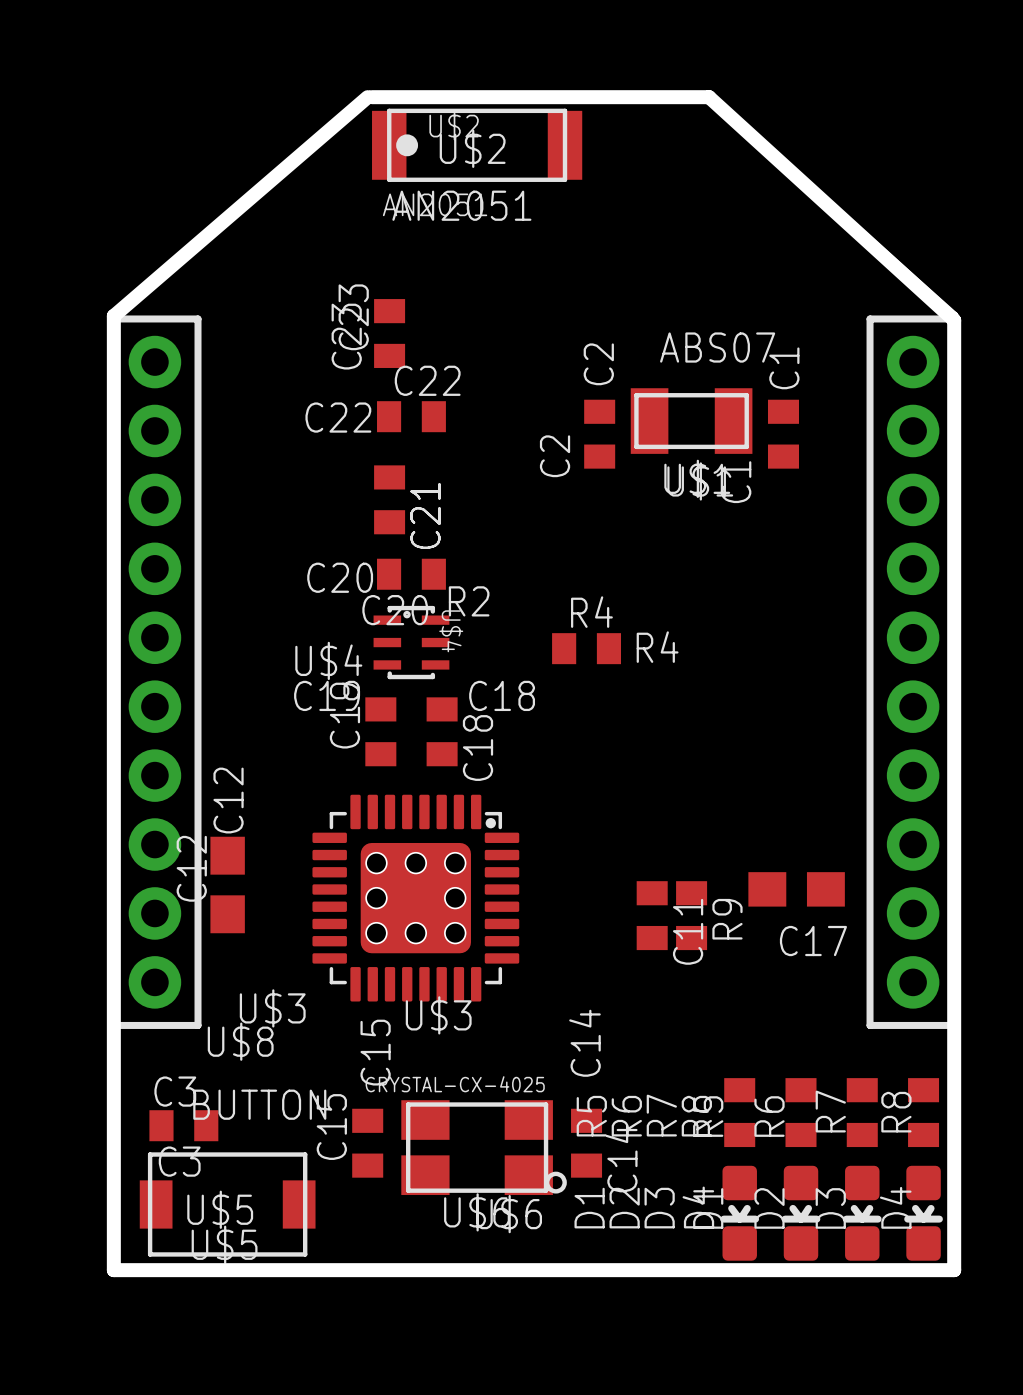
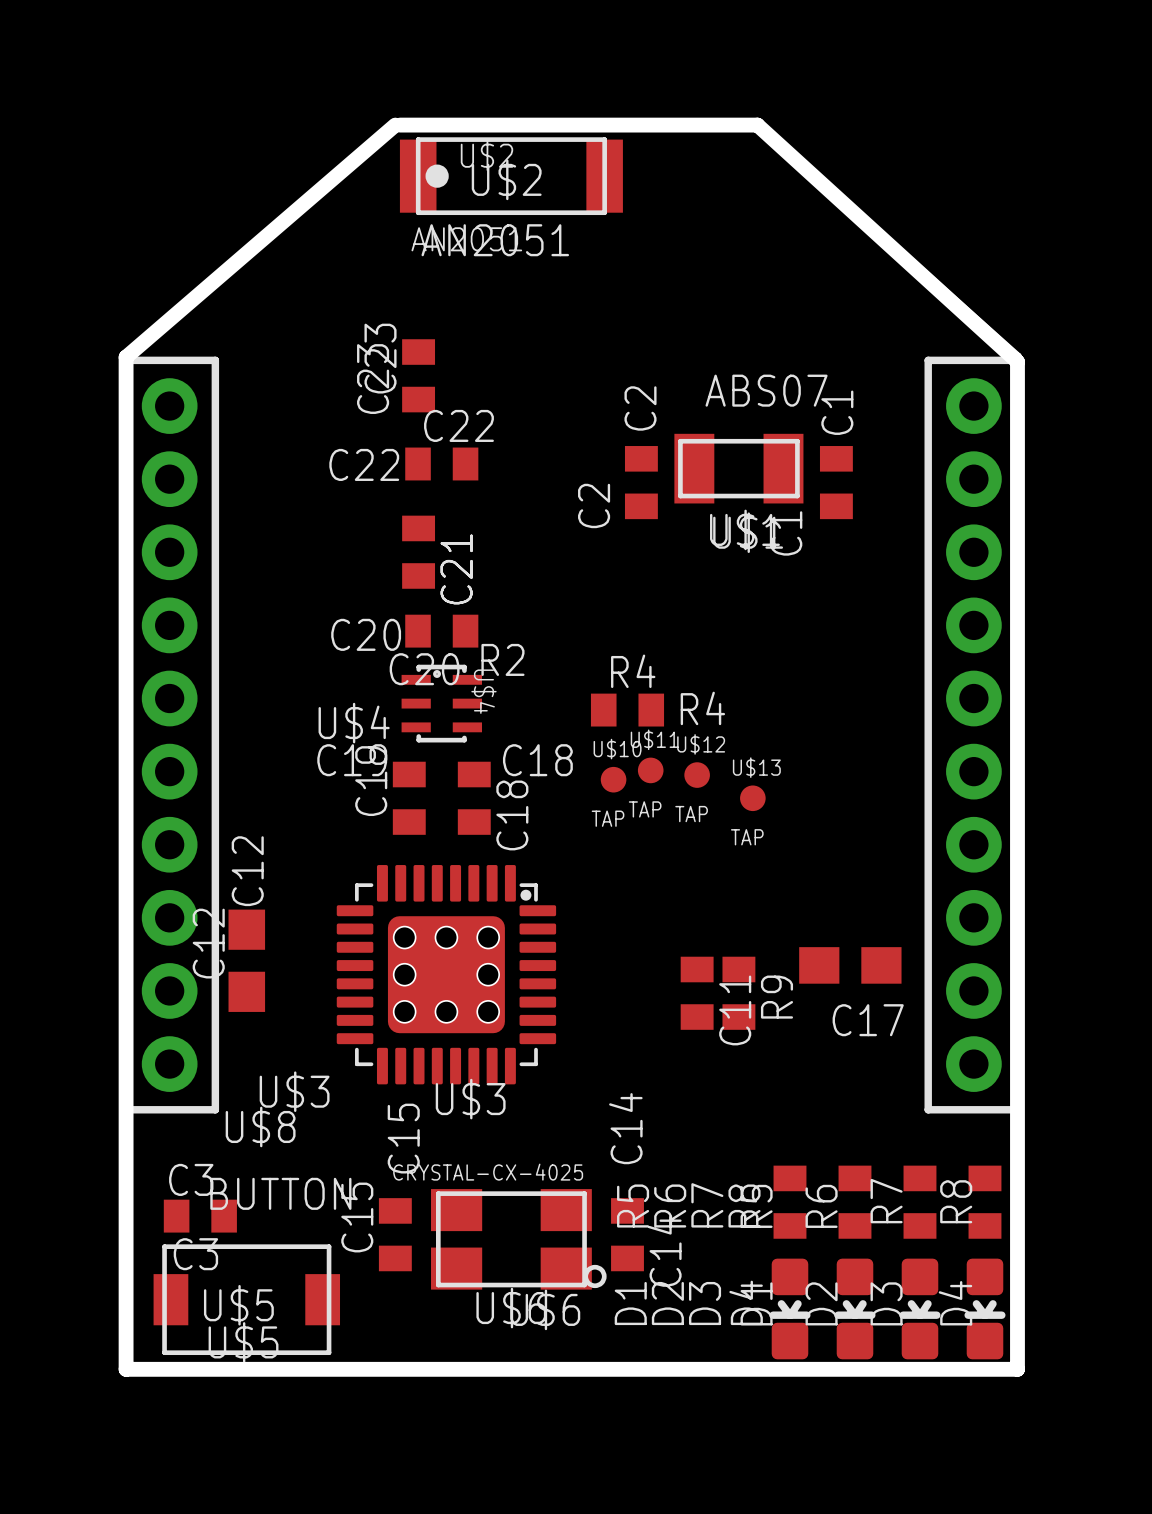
U$11: none -> TAP (650, 770)
U$12: none -> TAP (697, 775)
U$10: none -> TAP (613, 779)
U$13: none -> TAP (752, 798)

